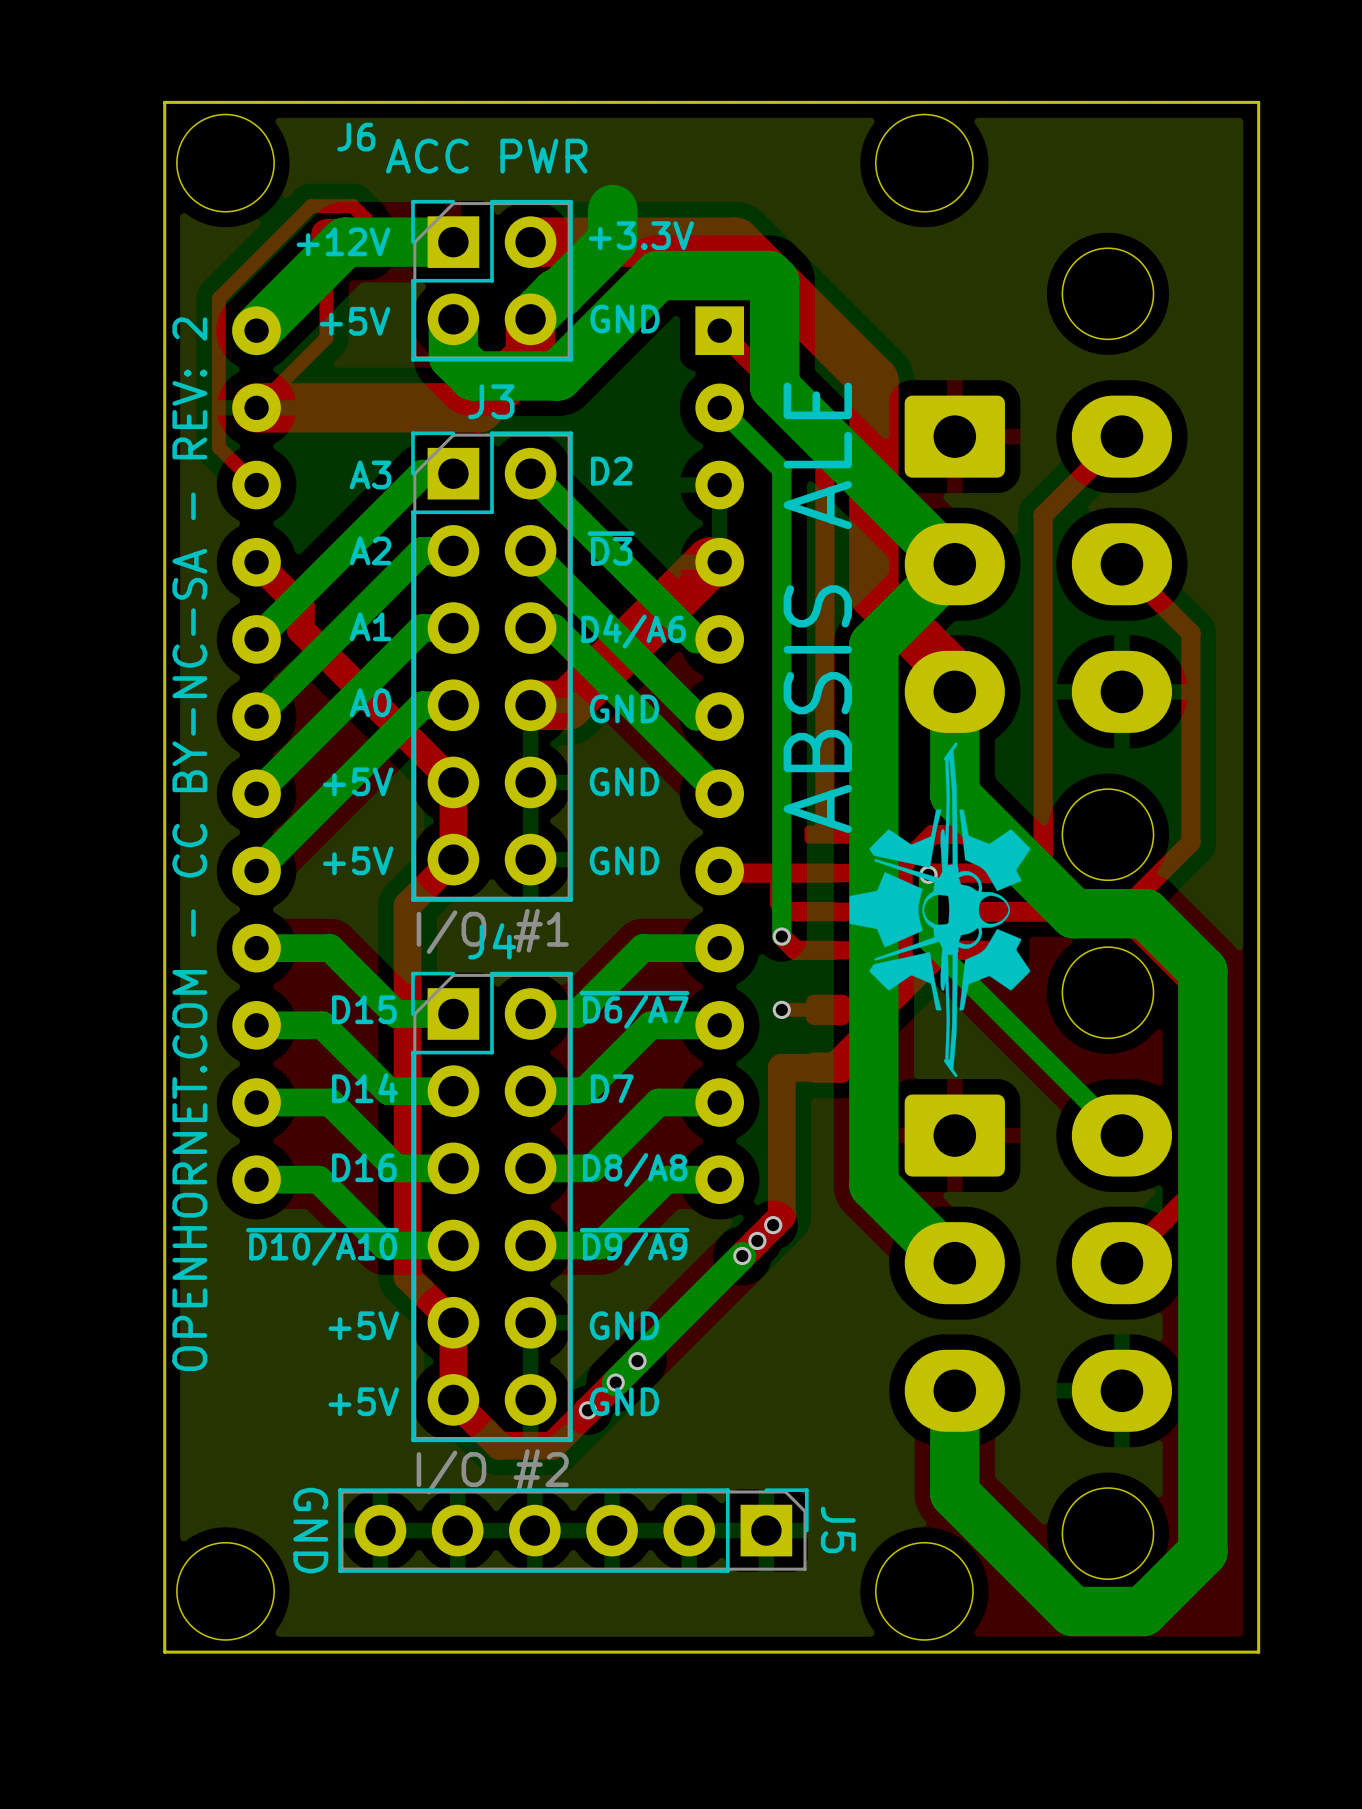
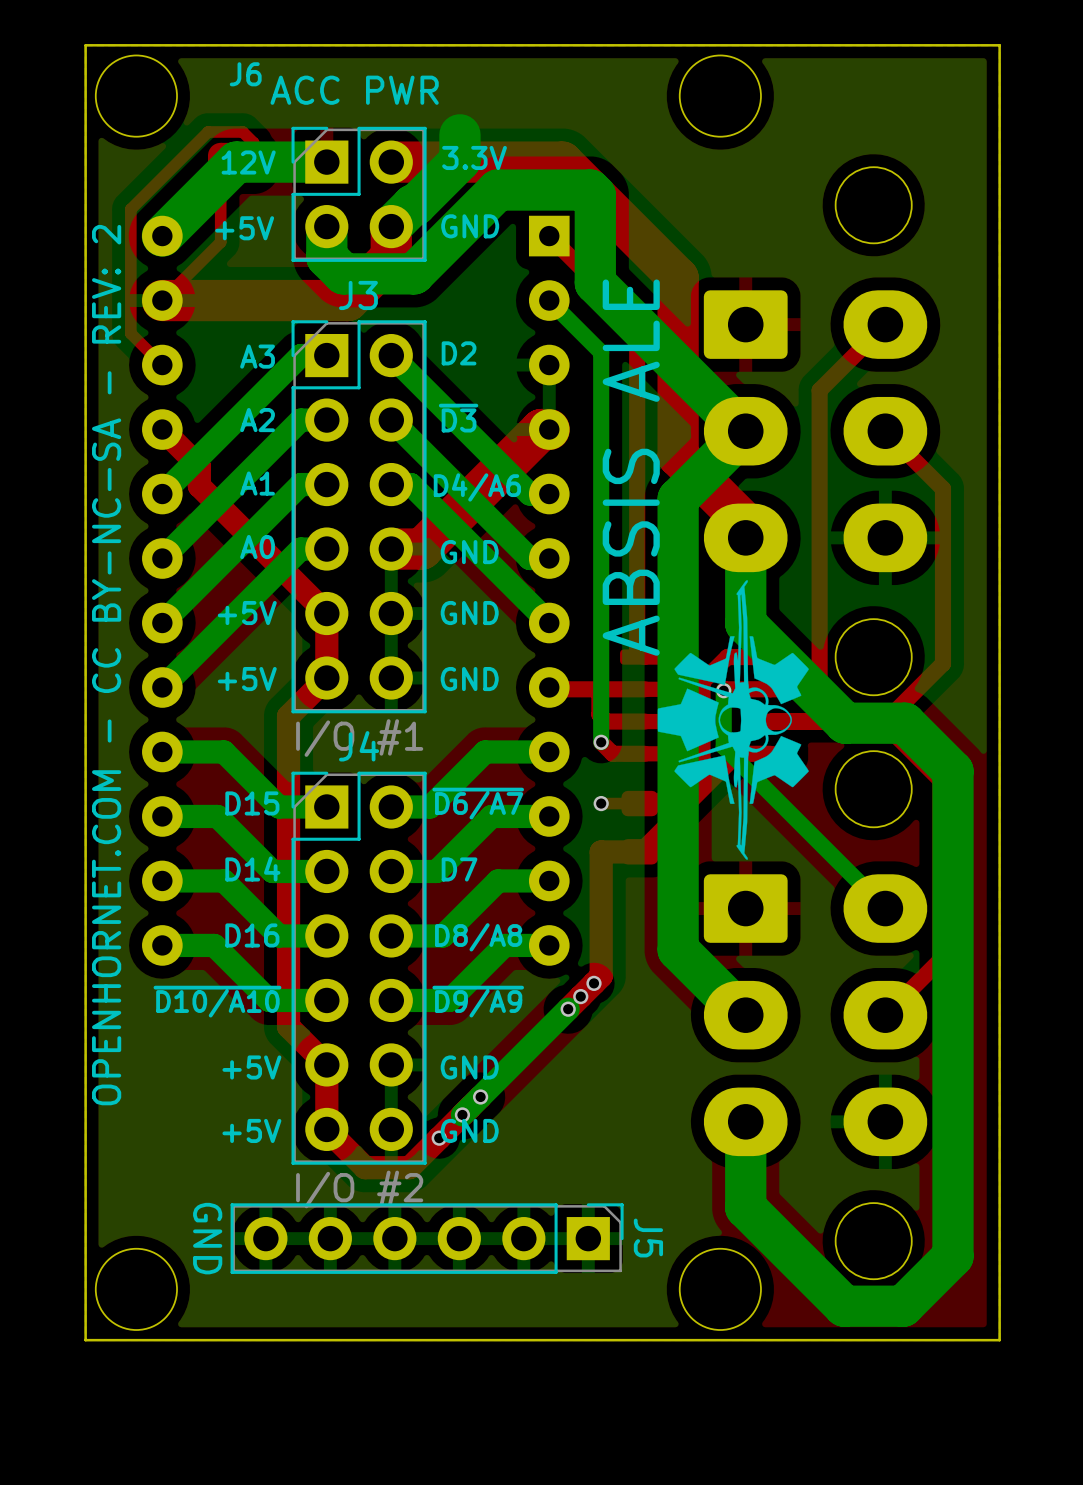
text: +3.3V (641, 235) -> 3.3V (474, 157)
text: +12V (343, 241) -> 12V (248, 162)

